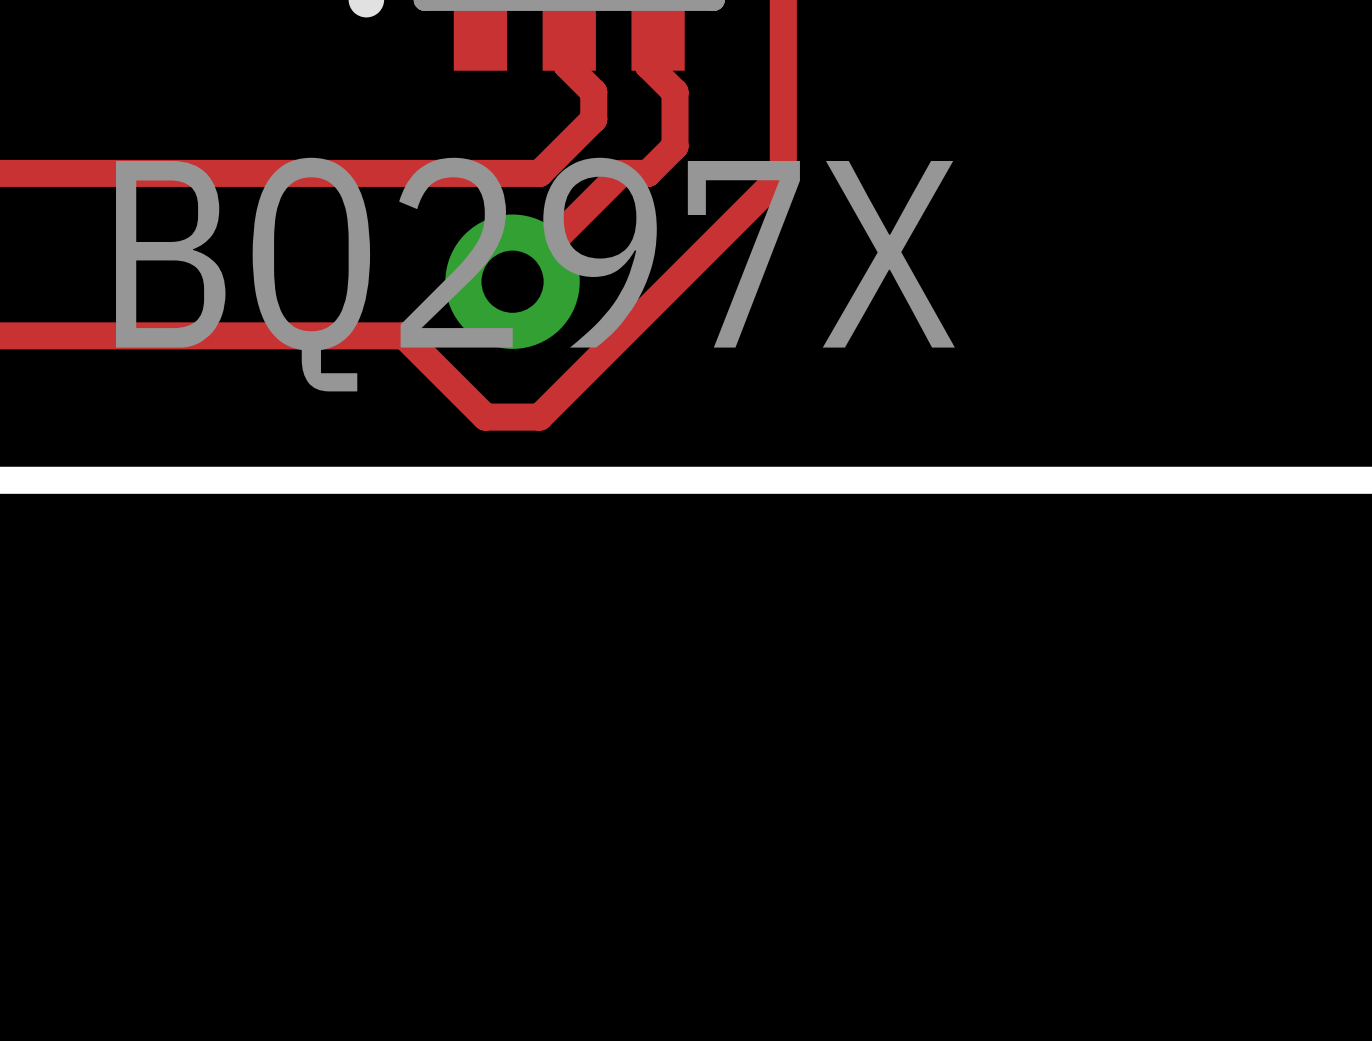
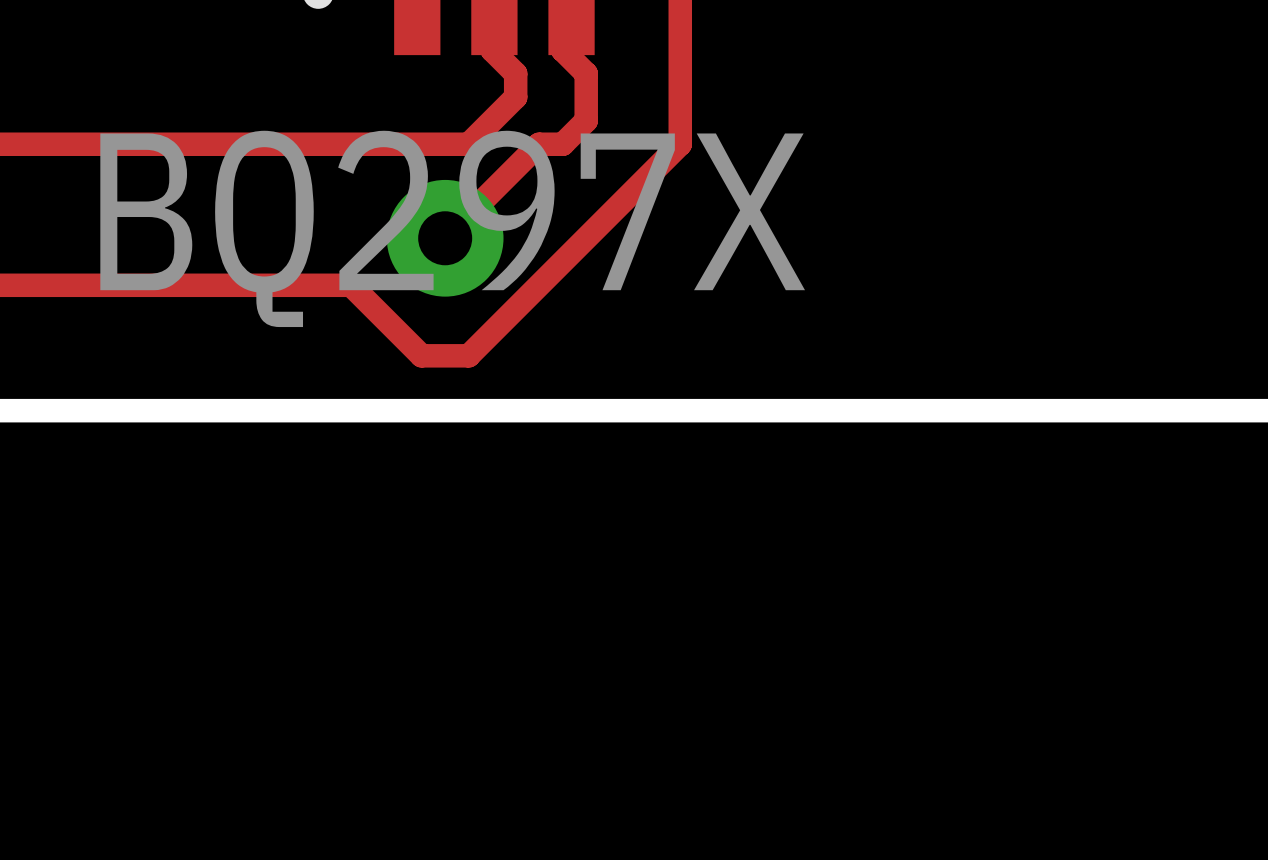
part value position: BQ297X (535, 274) -> BQ297X (452, 228)

